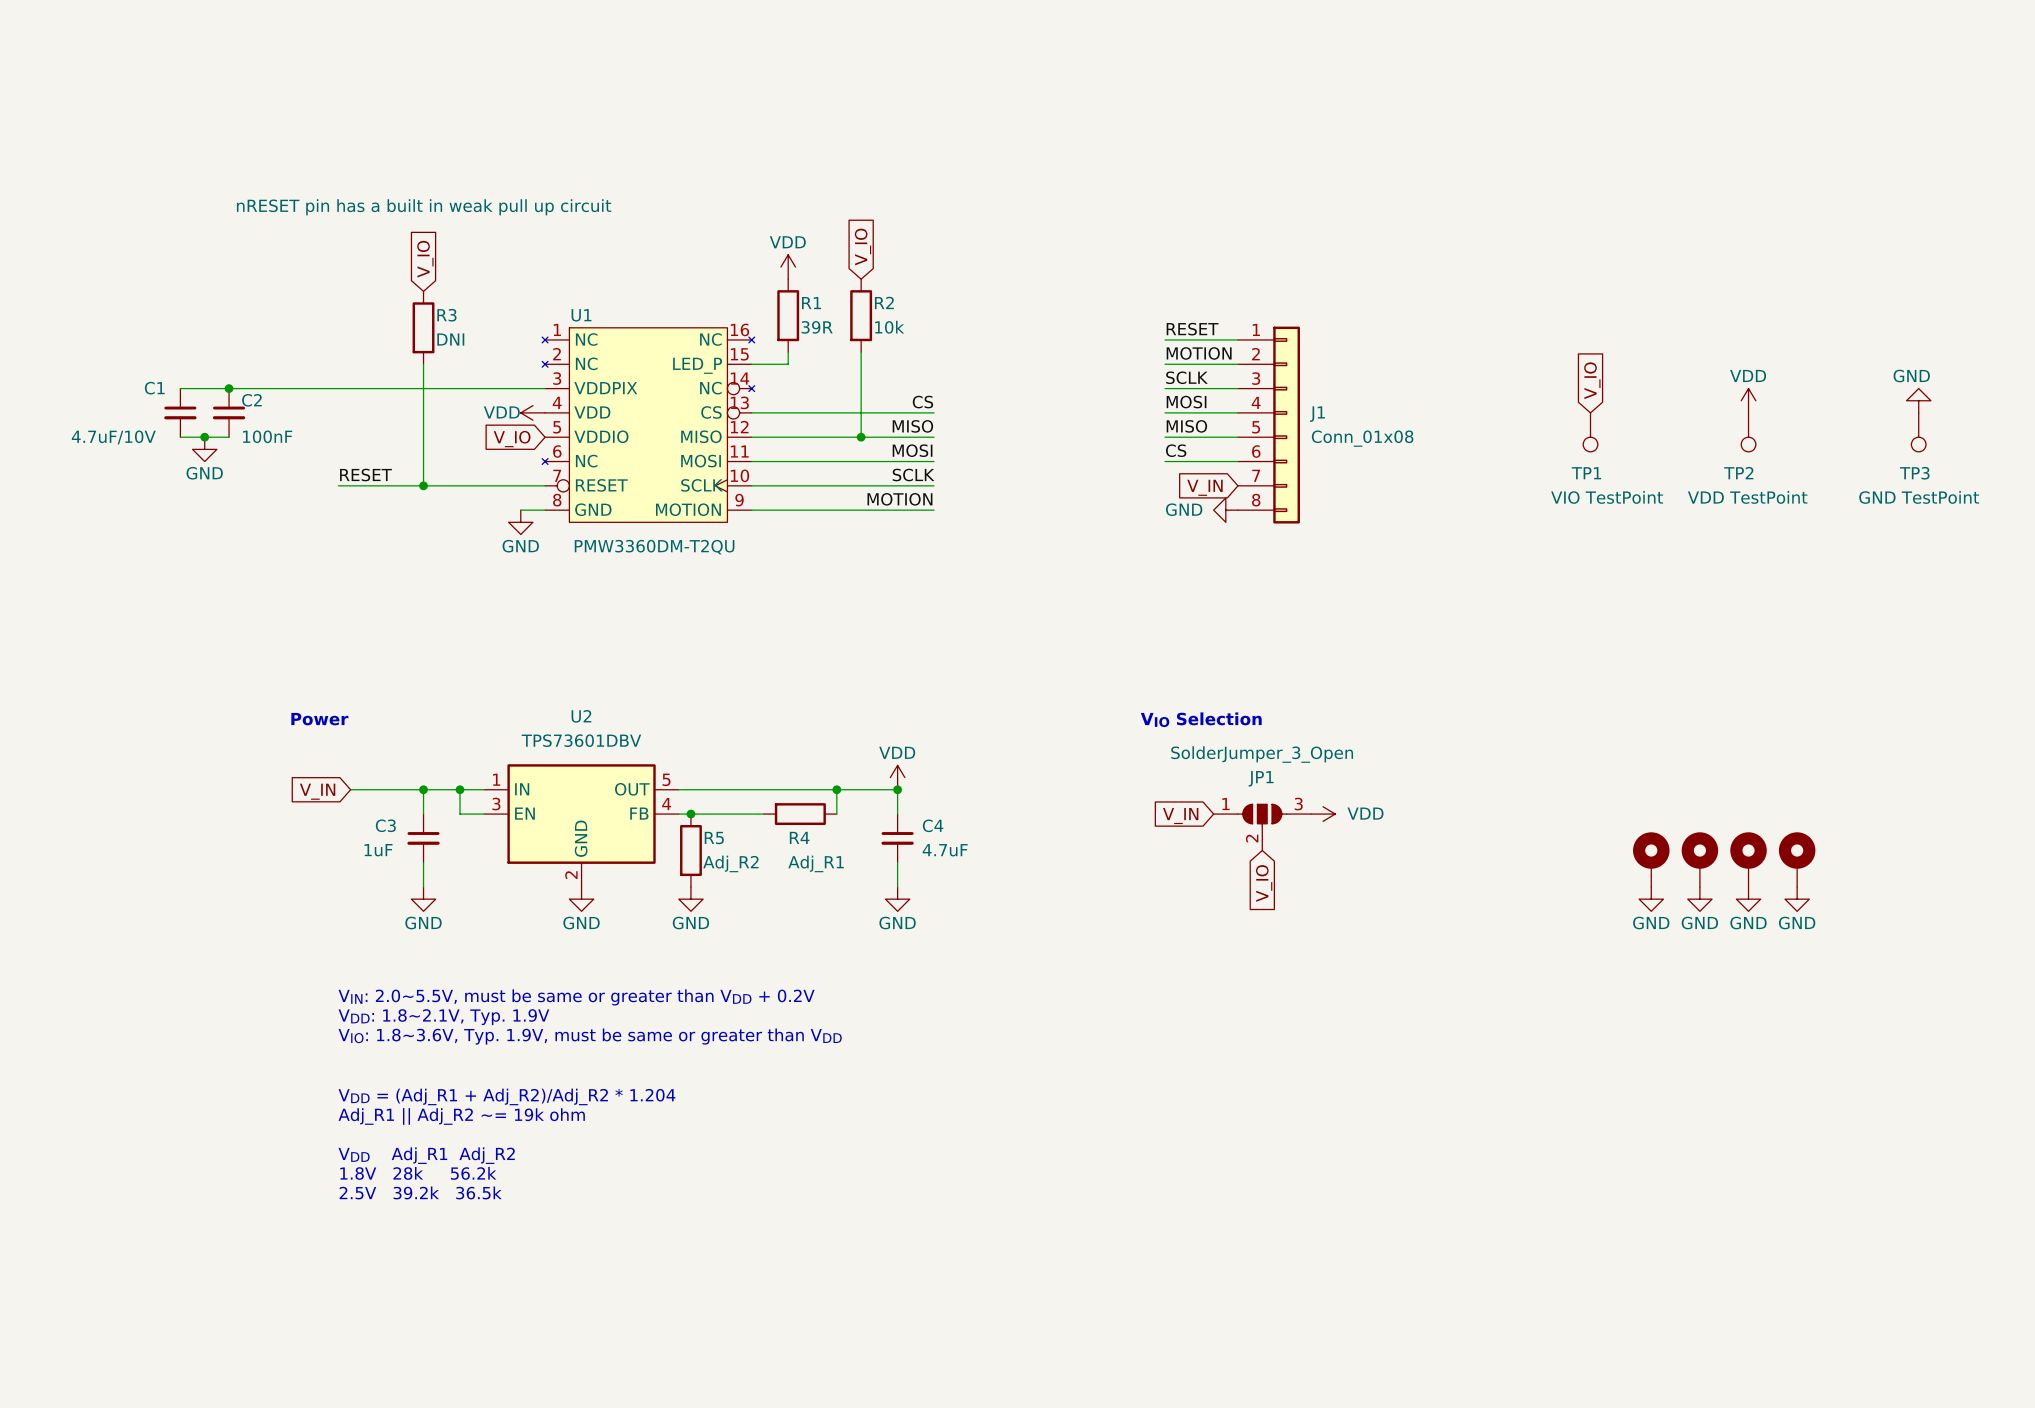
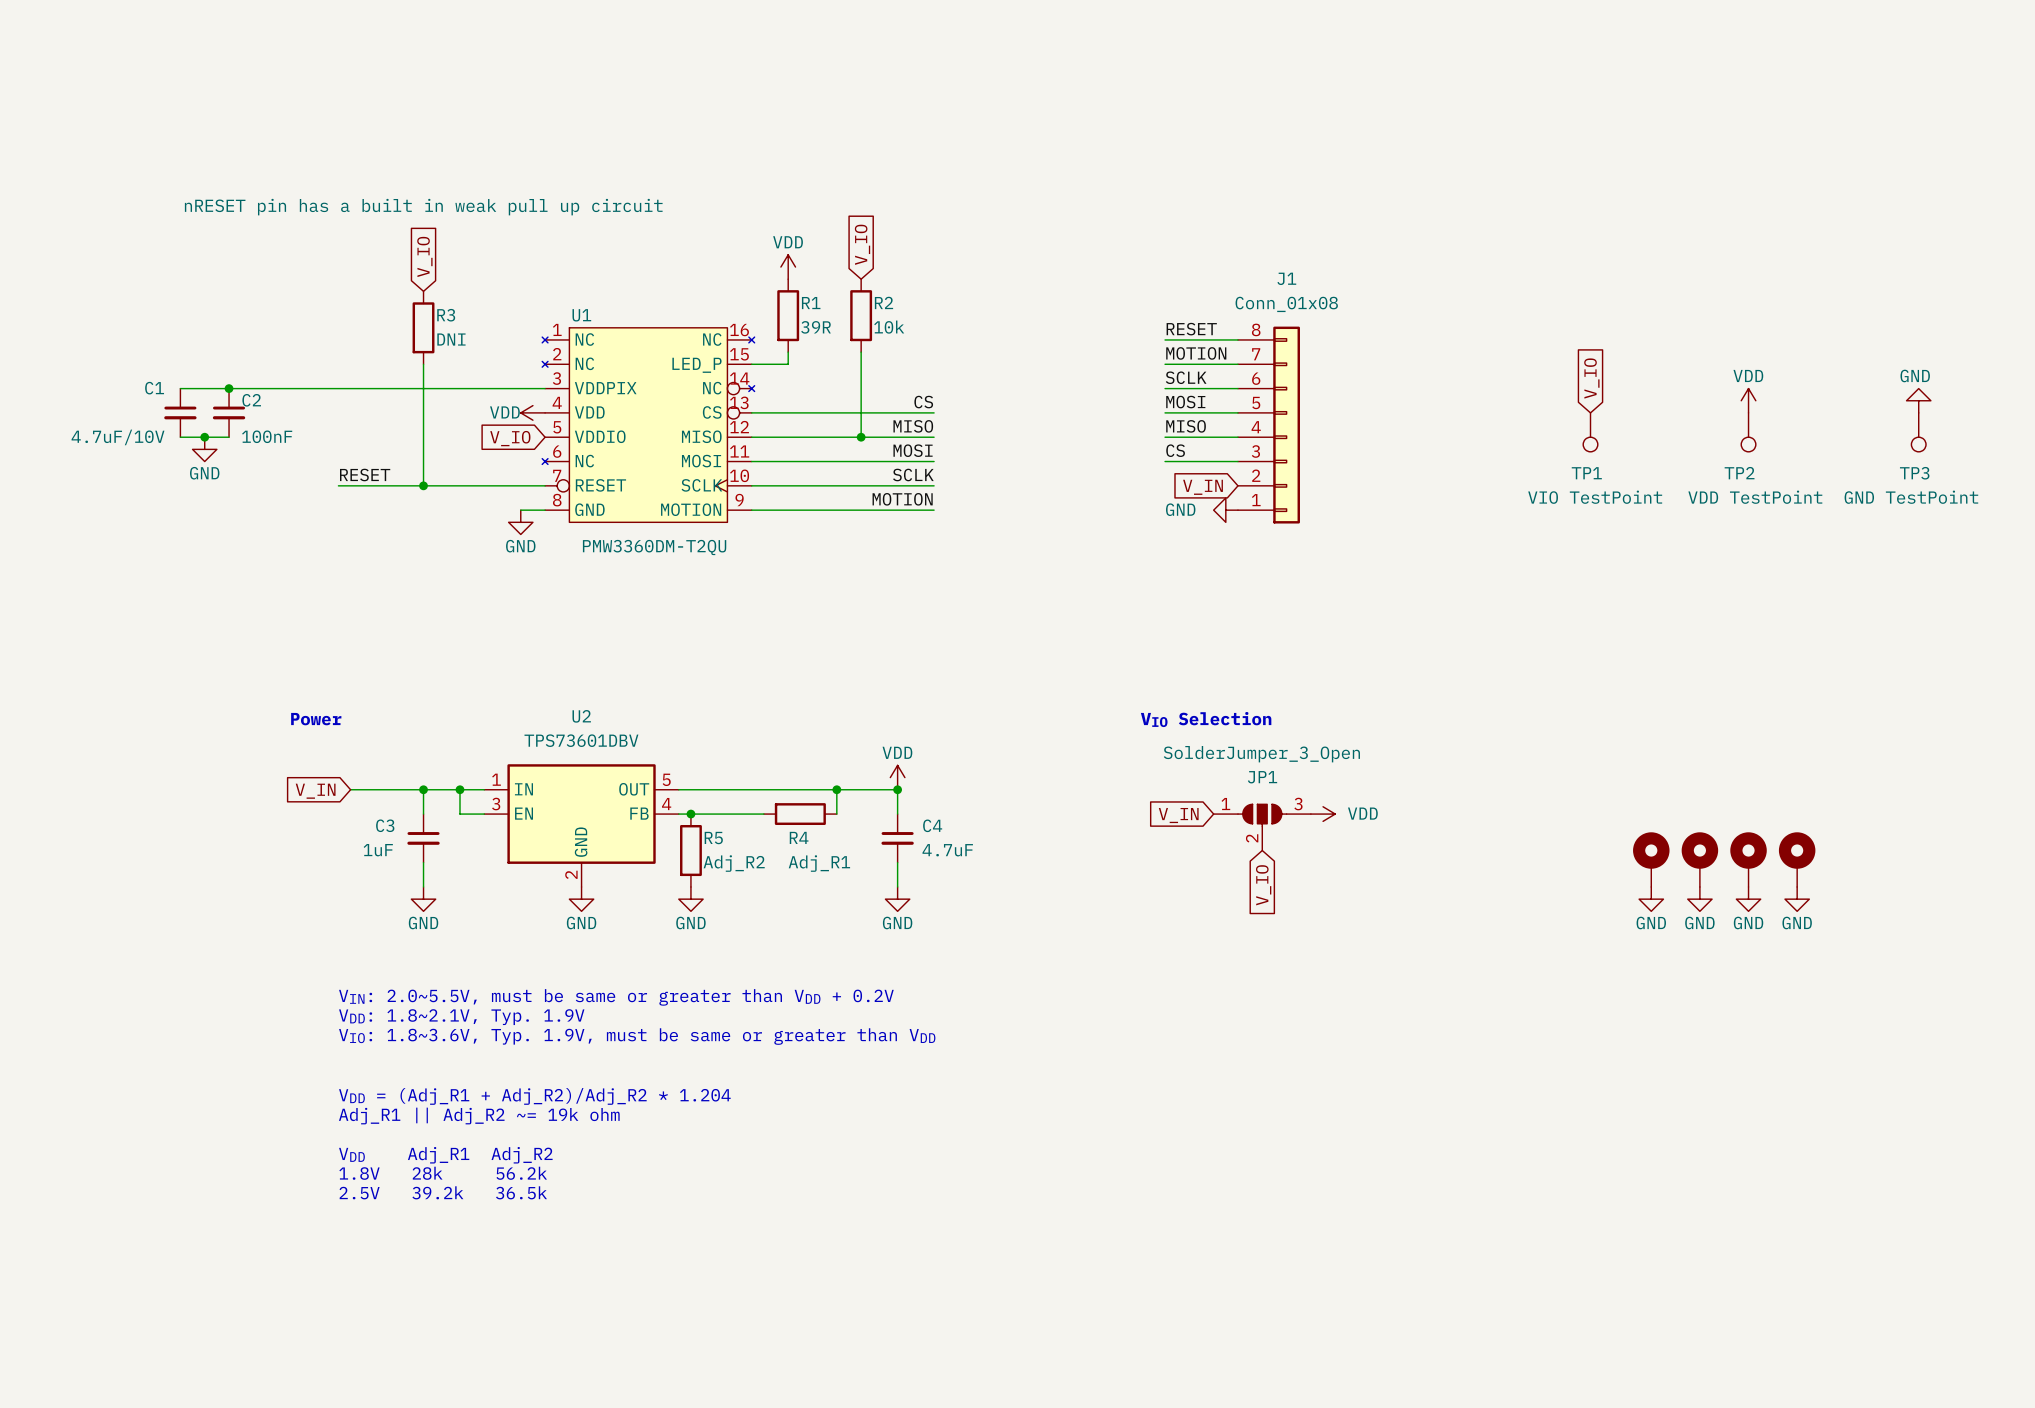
J1 name position: J1 (1317, 414) -> J1 (1286, 278)
J1 flip: as is (1286, 425) -> up-down (1286, 425)
J1 value position: Conn_01x08 (1362, 438) -> Conn_01x08 (1286, 304)

